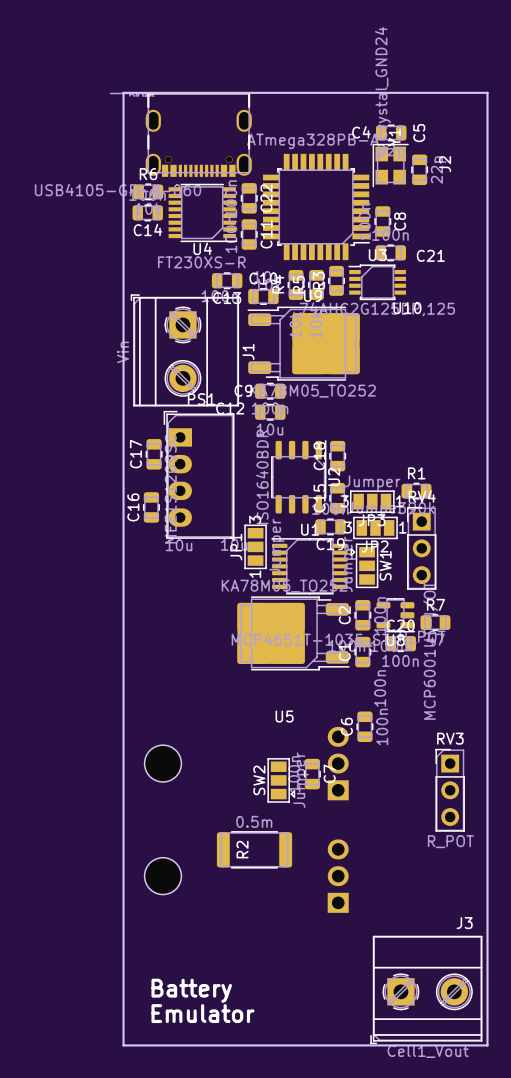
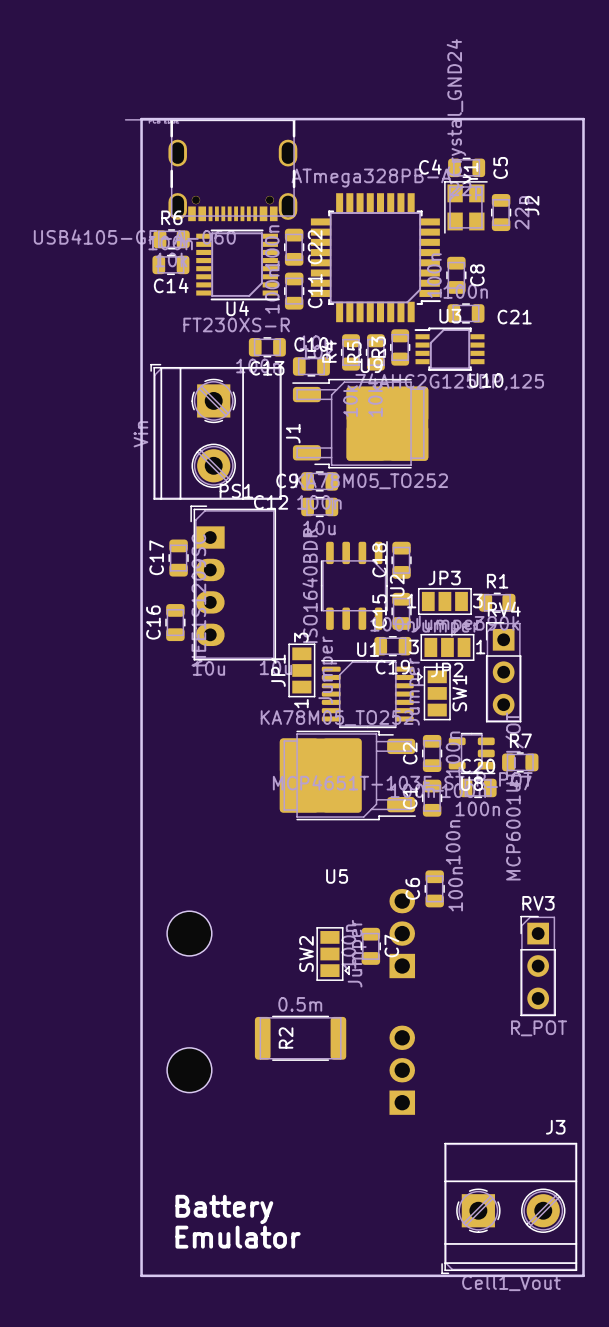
JP3 rotation: 0° (372, 501) -> 180° (444, 601)

